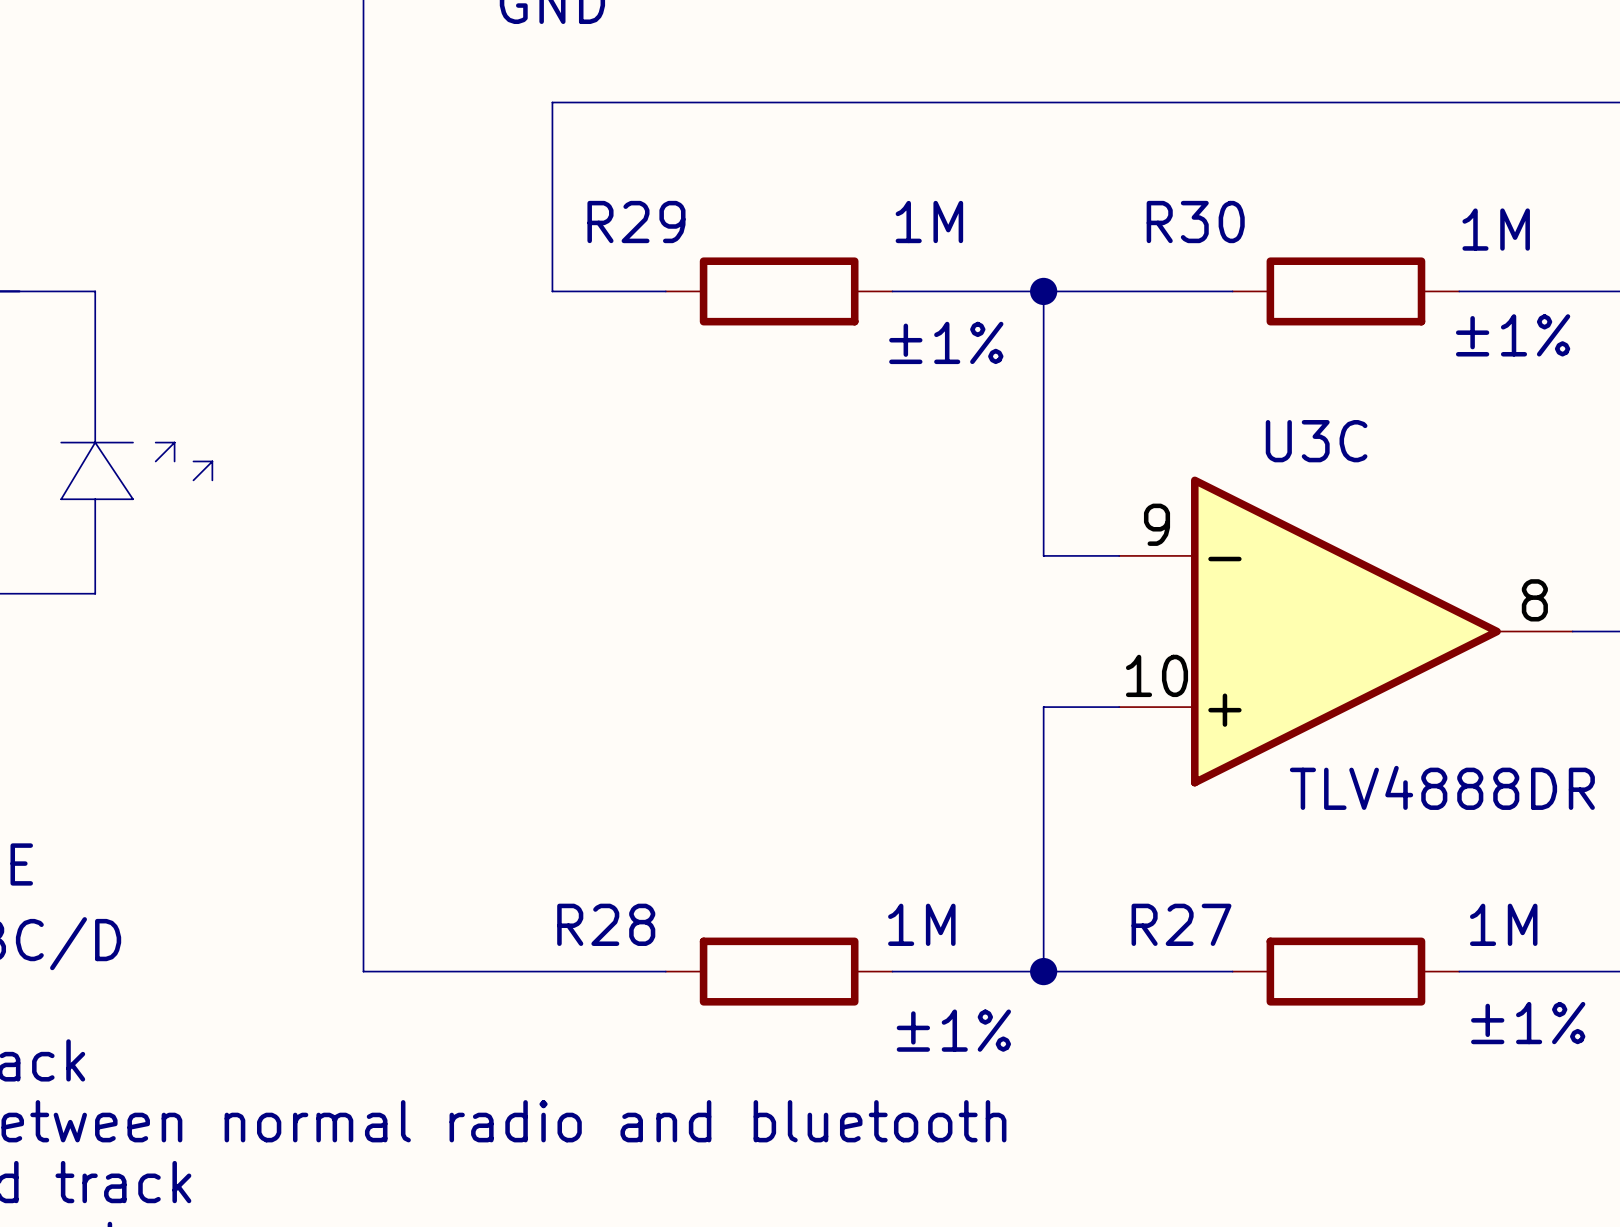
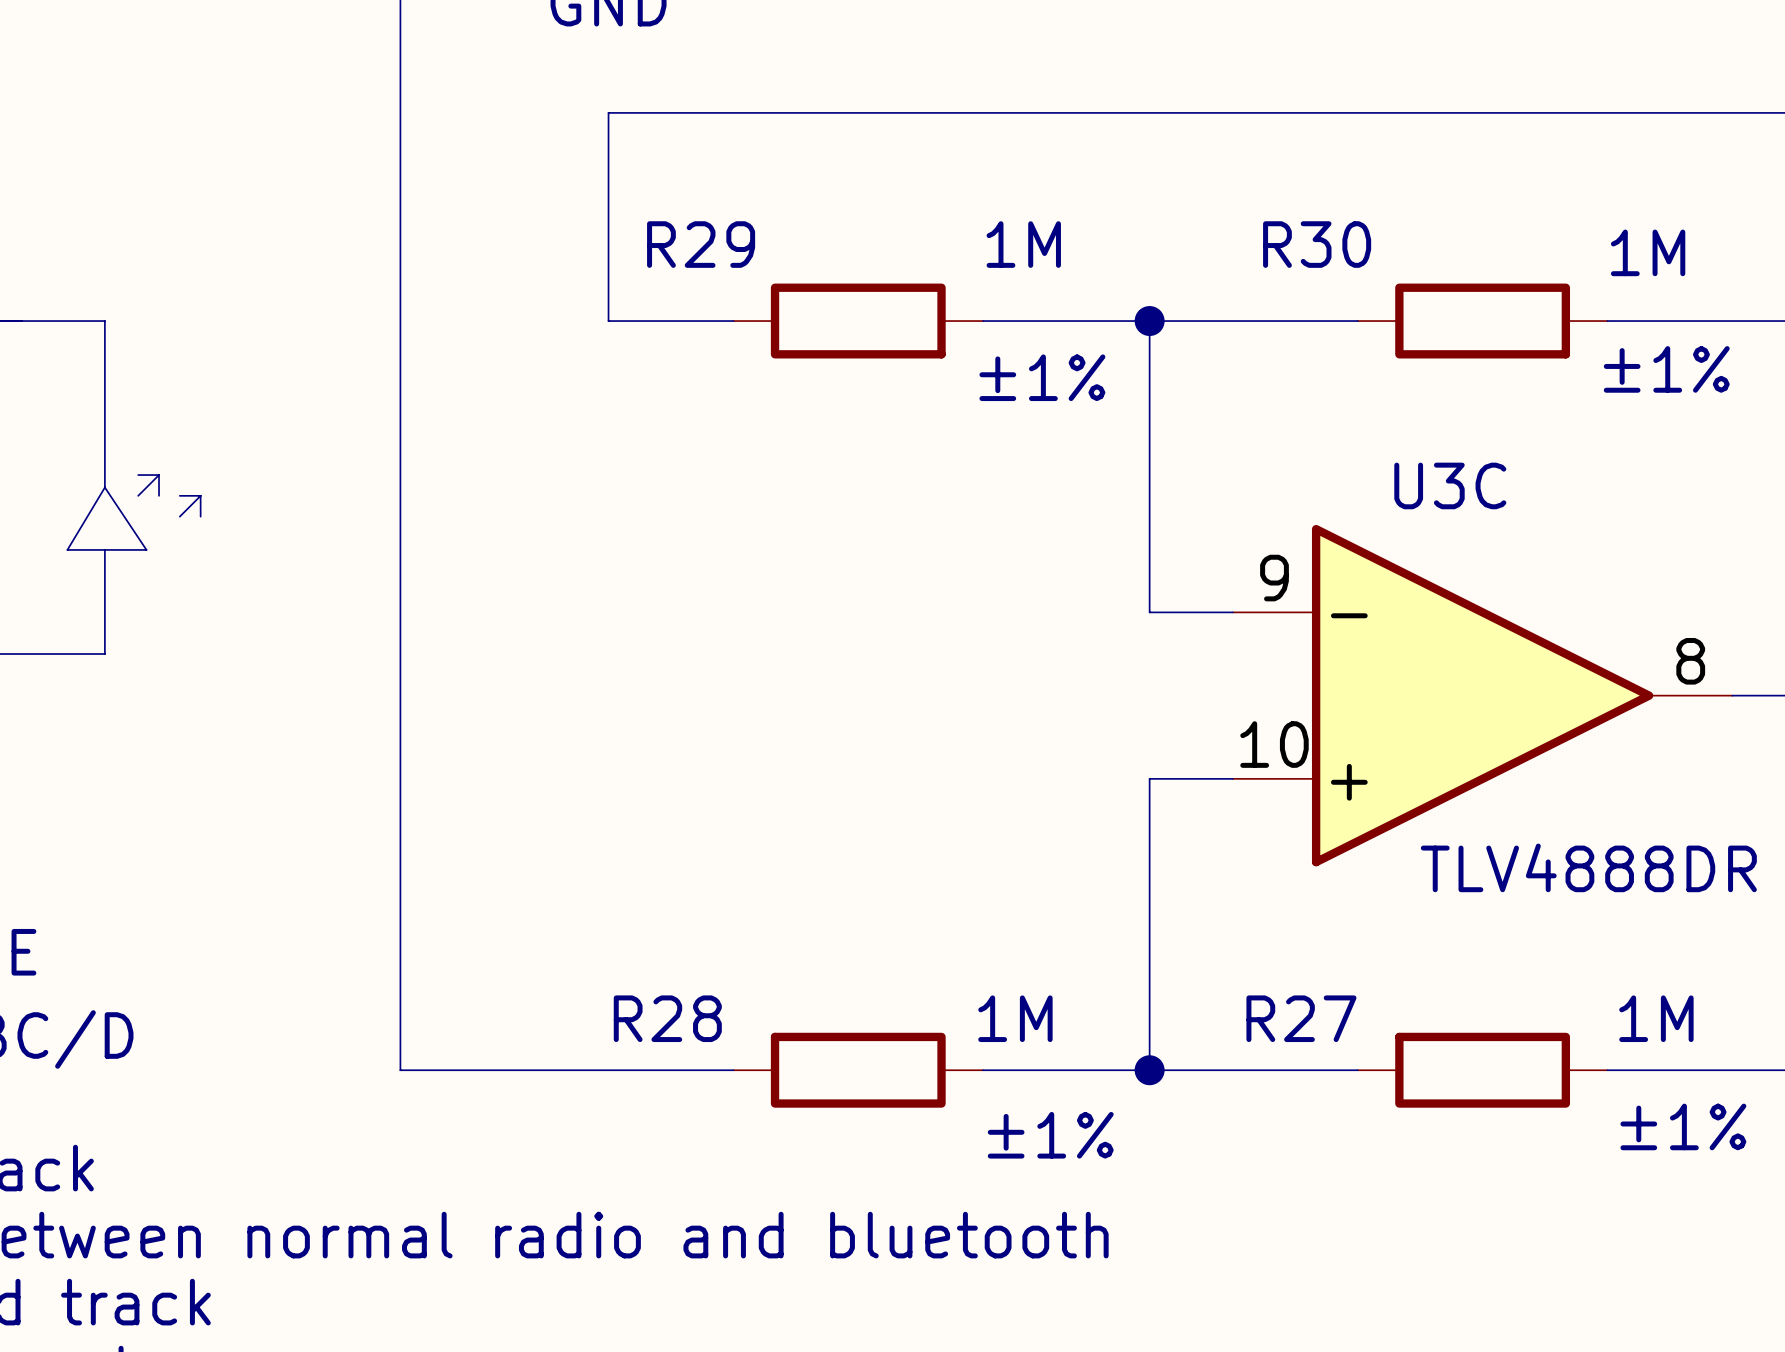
line: (61, 442) (133, 442) -> none
line: (155, 442) (174, 442) -> (138, 475) (159, 475)
line: (174, 442) (155, 461) -> (159, 475) (138, 495)
line: (174, 442) (174, 461) -> (159, 475) (159, 495)
line: (193, 461) (212, 461) -> (179, 495) (200, 495)
line: (212, 461) (212, 480) -> (200, 495) (200, 516)
line: (212, 461) (193, 480) -> (200, 495) (179, 516)

